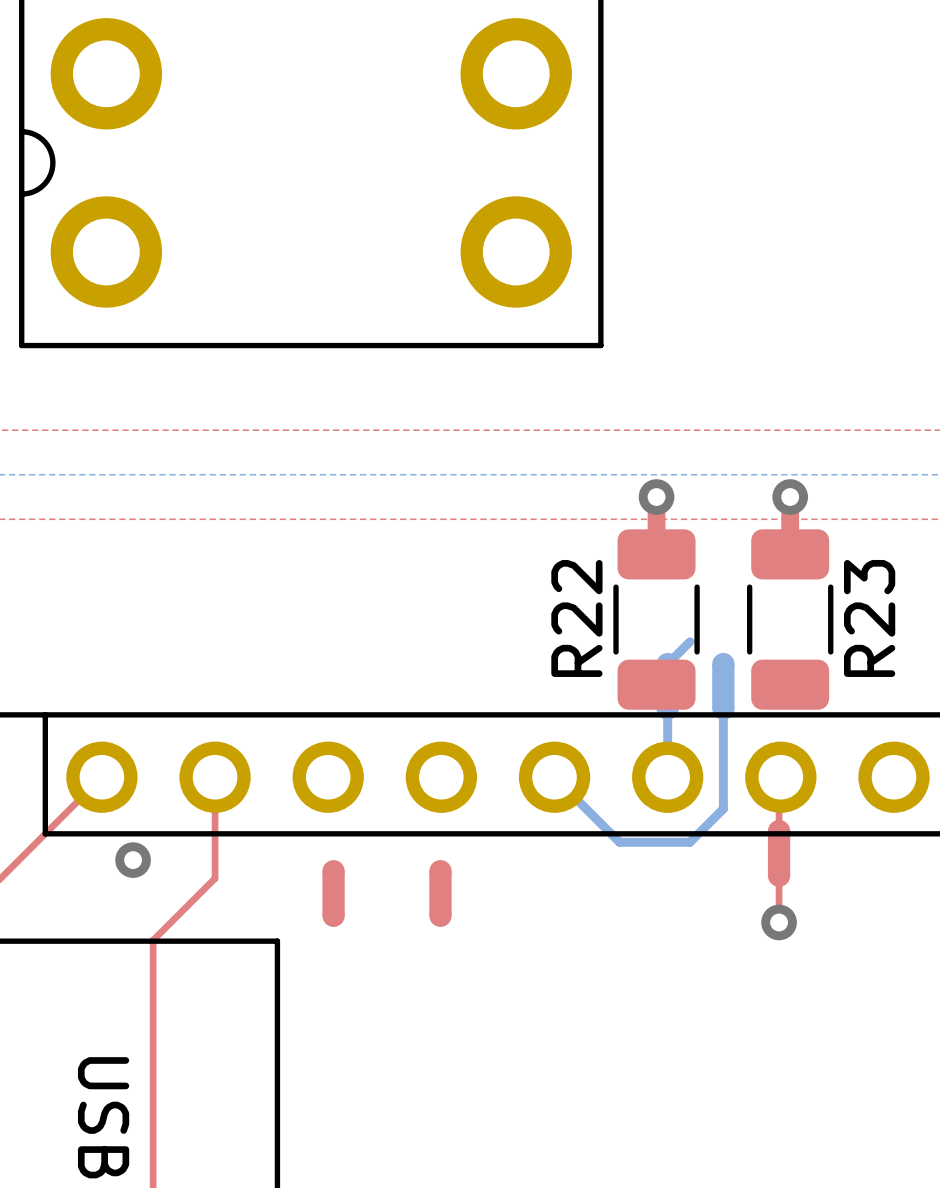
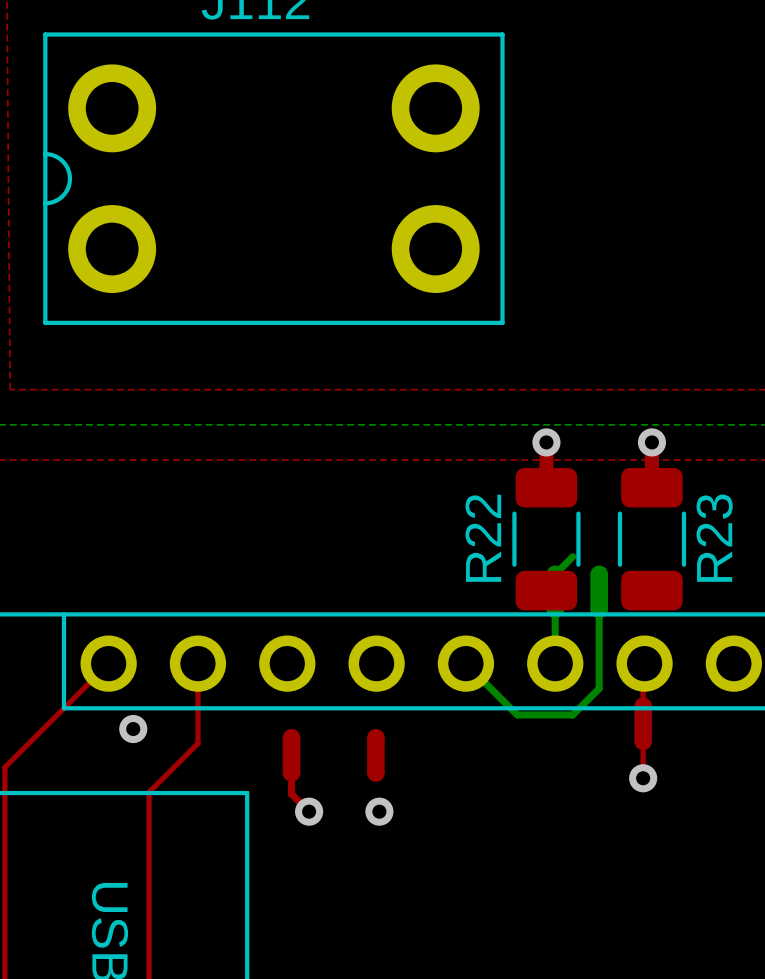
top track: none -> (291, 772) (291, 794) (309, 811)
via: none -> (309, 811)
via: none -> (379, 811)

